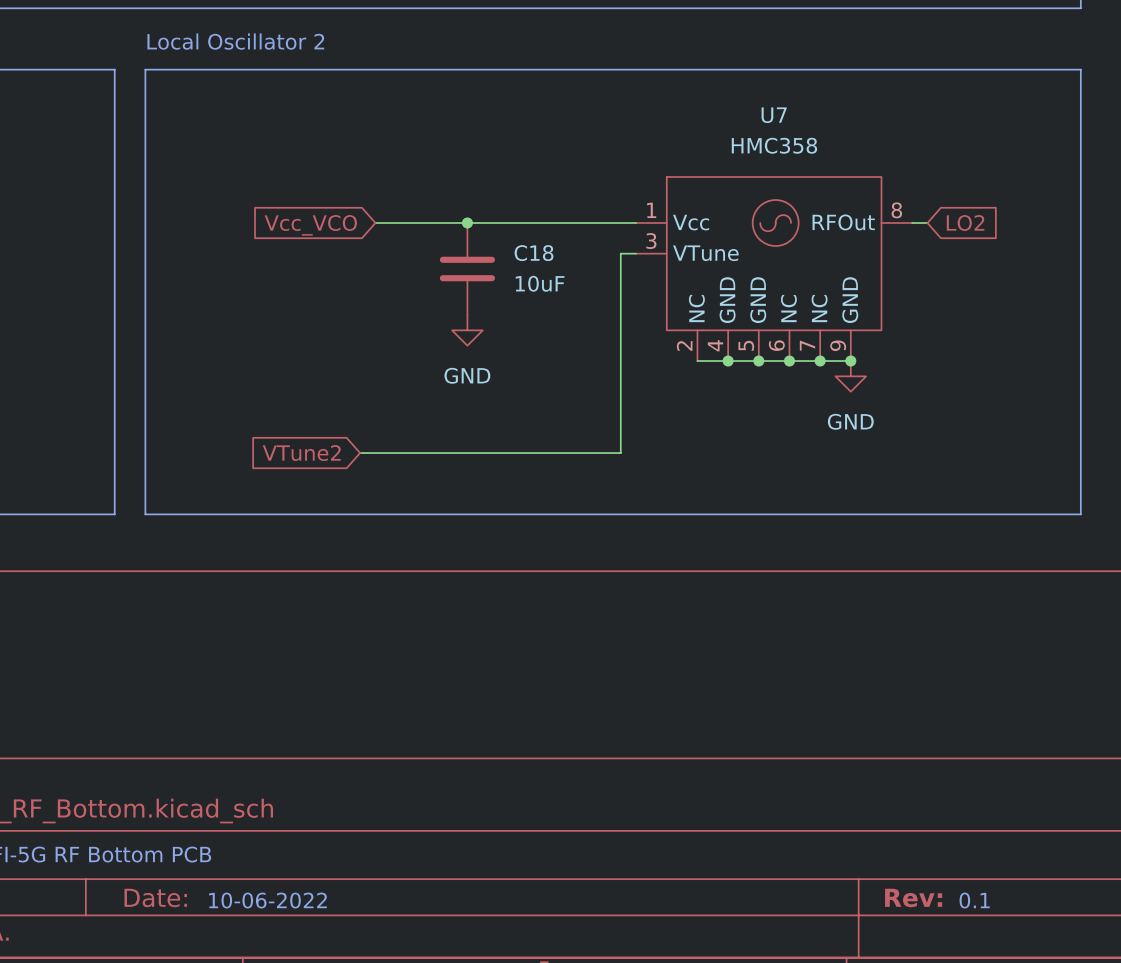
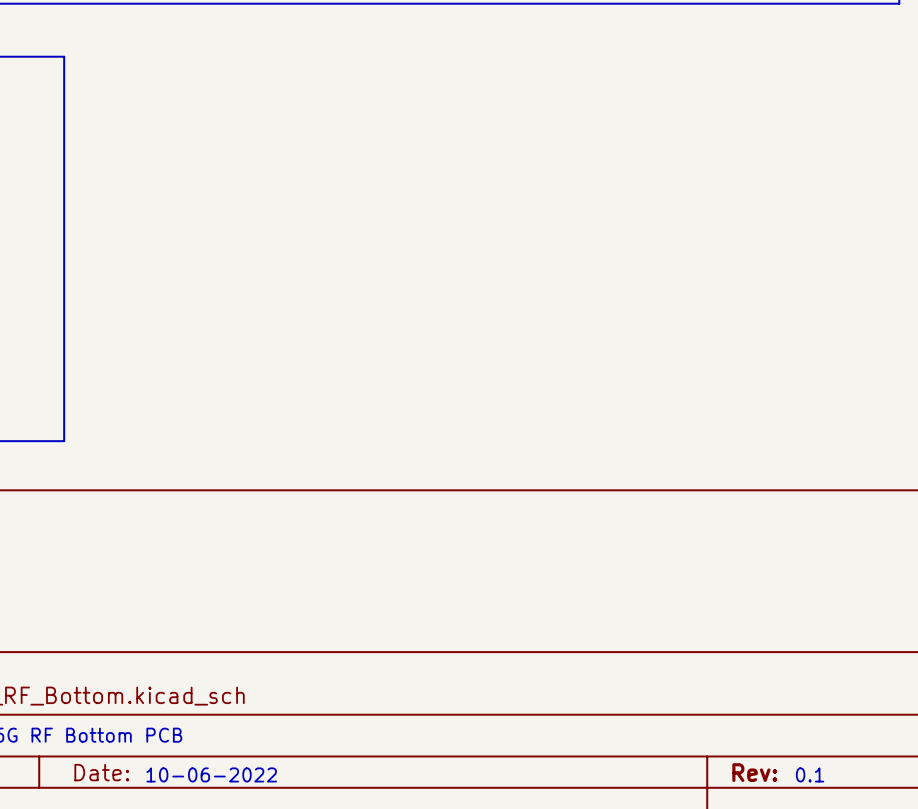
text: Local Oscillator 2 (235, 41) -> none
line: (145, 69) (1080, 69) (1080, 514) (145, 514) (145, 69) -> none
wire: (375, 223) (636, 223) -> none
junction: (467, 223) -> none
wire: (912, 223) (927, 223) -> none
global label: LO2 (965, 223) -> none
global label: Vcc_VCO (310, 225) -> none
wire: (636, 253) (620, 253) (620, 453) (360, 453) -> none
C18: 10uF (467, 269) -> none
U7: HMC358 (774, 269) -> none
power symbol: GND (467, 330) -> none
wire: (697, 361) (850, 361) -> none
junction: (728, 361) -> none
junction: (758, 361) -> none
junction: (789, 361) -> none
junction: (820, 361) -> none
junction: (850, 361) -> none
power symbol: GND (850, 376) -> none
global label: VTune2 (301, 453) -> none

